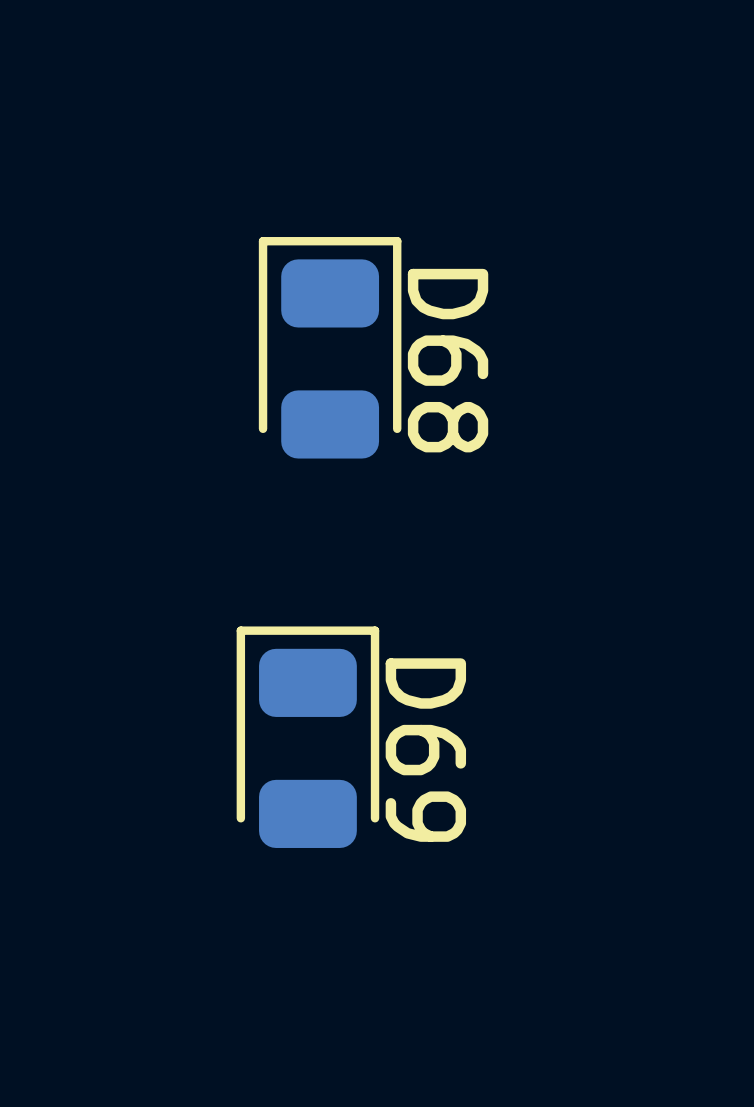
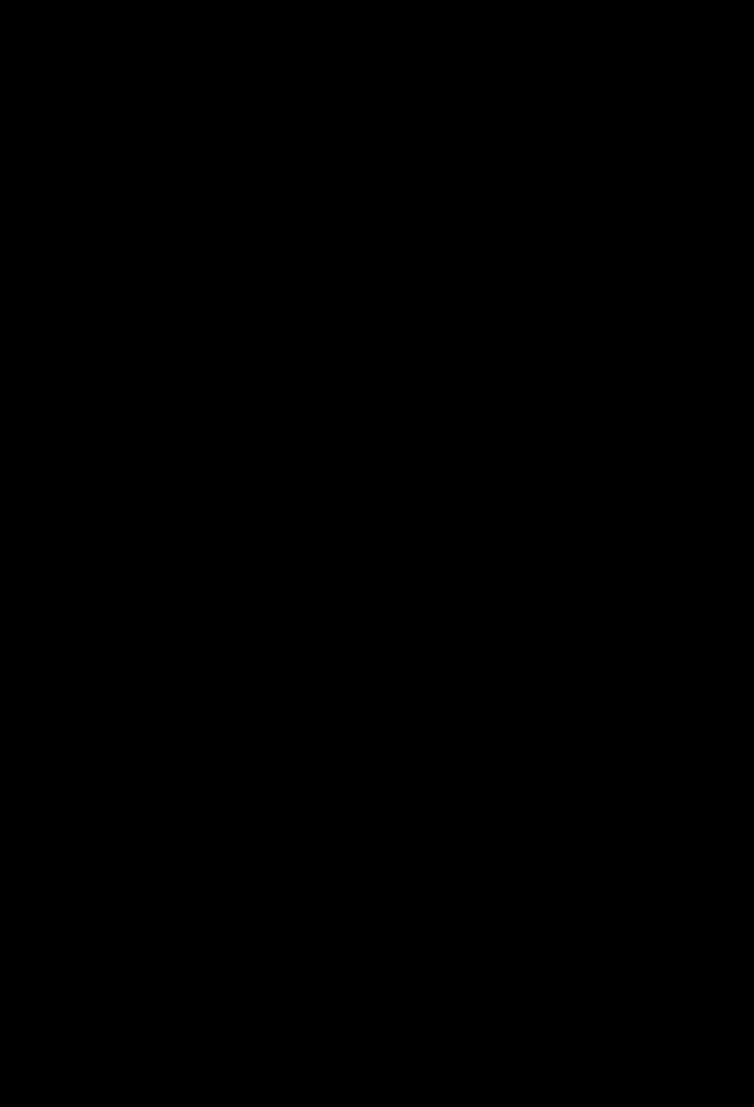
D68: (330, 347) -> none
D69: (307, 737) -> none

